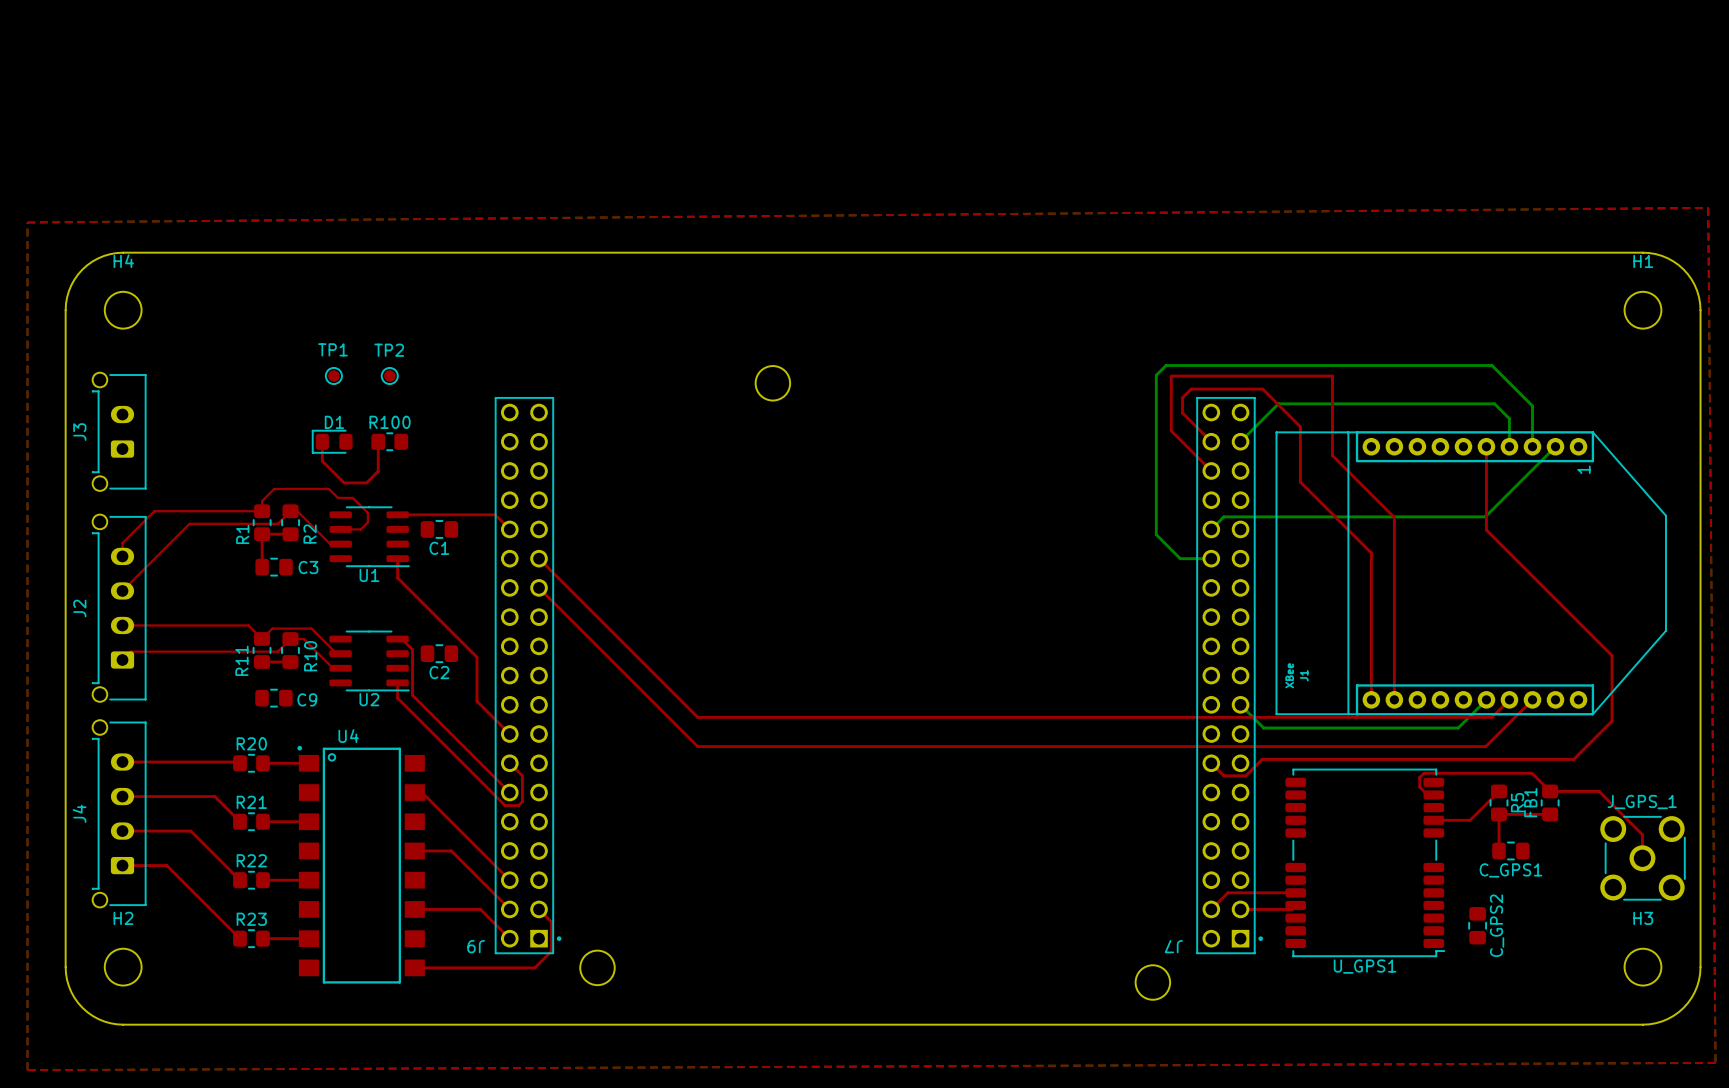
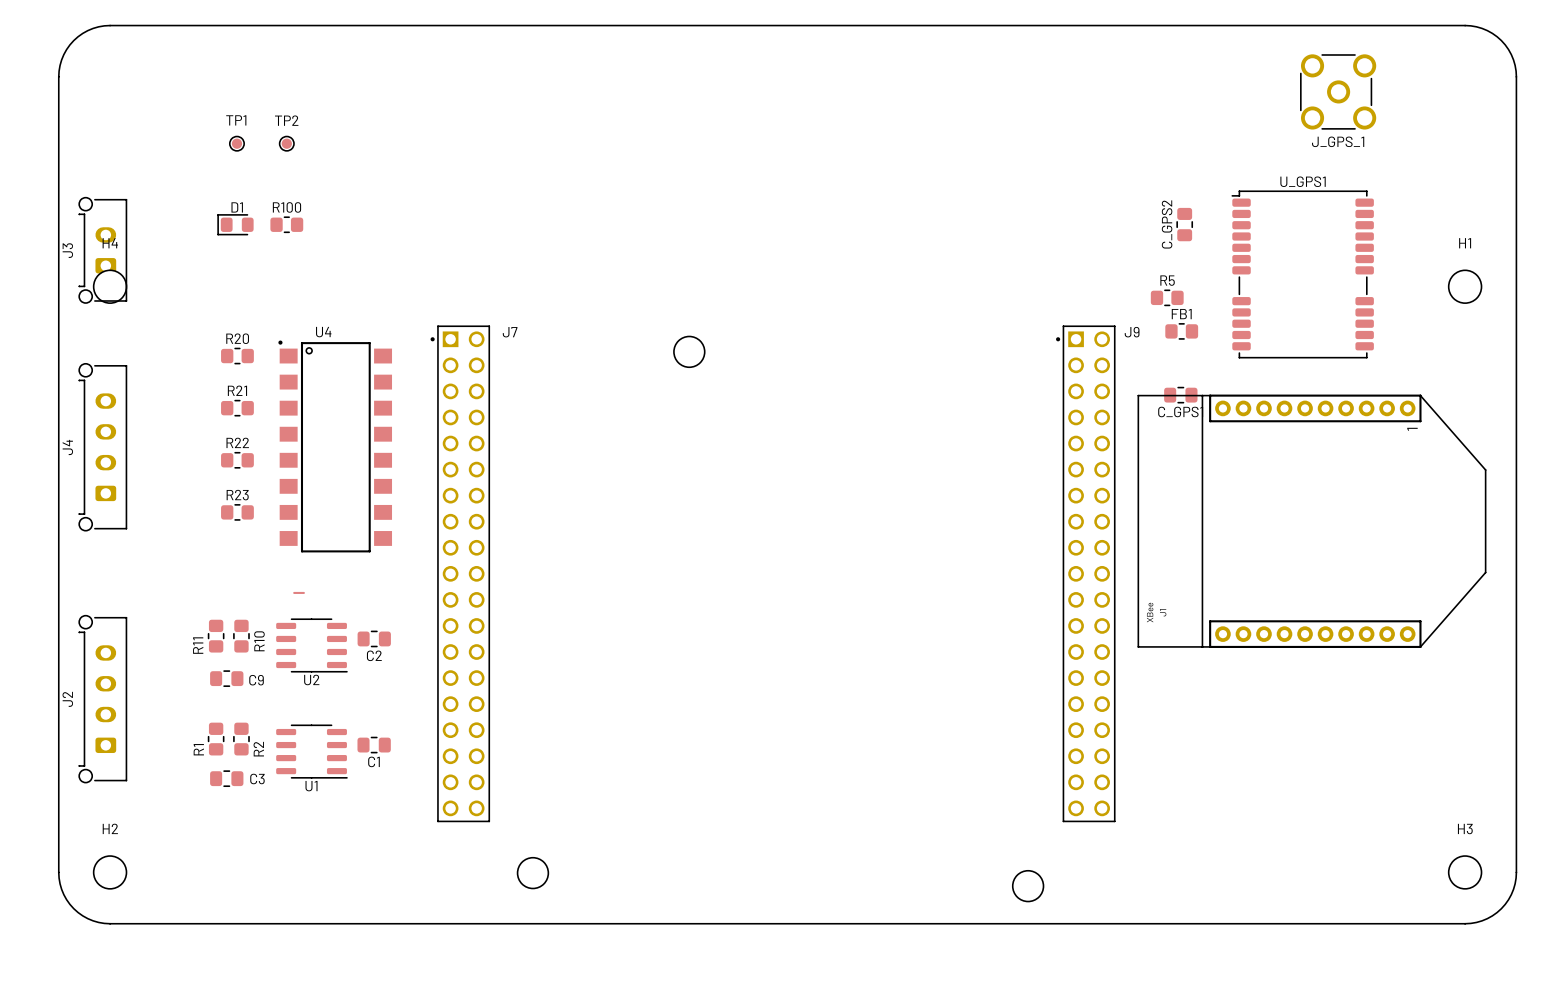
top zone outline: (1708, 207) (27, 222) (27, 1070) (1715, 1062) (1708, 207) -> none
board edge: (65, 310) (68, 291) (82, 269) (104, 255) (123, 252) (1642, 252) (1661, 255) (1683, 269) (1694, 285) (1700, 310) -> (58, 286) (60, 65) (66, 49) (78, 36) (93, 28) (110, 25) (1476, 26) (1487, 30) (1501, 40) (1511, 54) (1516, 71) (1516, 286)
TP1 position: (333, 375) -> (236, 143)
TP2 position: (389, 375) -> (286, 143)
J3 position: (119, 431) -> (102, 250)
top track: (322, 441) (322, 461) (344, 482) (366, 482) (378, 471) (378, 441) -> none
D1 position: (332, 441) -> (235, 224)
R100 position: (389, 441) -> (286, 224)
top track: (1211, 441) (1182, 412) (1182, 397) (1191, 389) (1262, 389) (1300, 426) (1300, 482) (1371, 553) (1371, 699) -> none
bottom track: (1240, 441) (1278, 403) (1494, 403) (1509, 418) (1509, 446) -> none
top track: (1486, 446) (1486, 530) (1612, 655) (1612, 721) (1573, 759) (1262, 759) (1245, 775) (1223, 775) (1211, 763) -> none
bottom track: (1532, 446) (1532, 406) (1491, 365) (1166, 365) (1156, 375) (1156, 534) (1180, 558) (1211, 558) -> none
bottom track: (1555, 446) (1485, 516) (1223, 516) (1211, 529) -> none
top track: (1211, 470) (1171, 430) (1171, 376) (1332, 376) (1332, 455) (1394, 517) (1394, 699) -> none
top track: (397, 514) (495, 514) (509, 529) -> none
R2 position: (262, 522) -> (216, 739)
R1 position: (290, 522) -> (241, 739)
top track: (340, 529) (360, 529) (367, 522) (367, 512) (352, 497) (337, 497) (329, 488) (274, 488) (262, 501) (262, 511) (154, 511) (122, 543) (122, 556) (124, 556) -> none
C1 position: (439, 529) -> (374, 745)
top track: (290, 534) (262, 534) (262, 567) -> none
U1 position: (369, 536) -> (311, 751)
top track: (340, 544) (330, 544) (297, 511) (290, 511) (277, 523) (189, 523) (122, 590) -> none
top track: (397, 558) (397, 577) (477, 657) (477, 701) (509, 734) -> none
top track: (539, 558) (697, 717) (1491, 717) (1509, 699) -> none
C3 position: (274, 567) -> (226, 778)
top track: (539, 587) (697, 746) (1485, 746) (1532, 699) -> none
J2 position: (119, 608) -> (102, 699)
top track: (122, 625) (248, 625) (262, 638) (272, 628) (311, 628) (336, 653) -> none
top track: (397, 639) (401, 639) (412, 649) (412, 695) (509, 792) -> none
R11 position: (262, 650) -> (216, 636)
R10 position: (290, 650) -> (241, 636)
C2 position: (439, 653) -> (374, 638)
top track: (122, 659) (130, 651) (277, 651) (290, 638) (303, 638) (329, 665) -> none
U2 position: (369, 660) -> (311, 645)
top track: (262, 662) (290, 662) -> none
J9 rotation: 0° (528, 675) -> 180° (1085, 573)
J9 position: (528, 675) -> (1085, 573)
J7 rotation: 0° (1229, 675) -> 180° (460, 573)
J7 position: (1229, 675) -> (460, 573)
top track: (397, 682) (397, 698) (505, 805) (518, 805) (522, 801) (522, 775) (509, 763) -> none
C9 position: (273, 698) -> (226, 678)
bottom track: (1486, 699) (1458, 728) (1263, 728) (1240, 704) -> none
top track: (122, 762) (239, 763) -> none
R20 position: (251, 763) -> (237, 356)
top track: (263, 763) (308, 763) -> none
top track: (1498, 791) (1470, 820) (1433, 820) -> none
top track: (414, 792) (422, 792) (509, 880) -> none
top track: (1433, 794) (1427, 794) (1419, 787) (1419, 777) (1424, 773) (1531, 773) (1550, 791) (1599, 791) (1642, 834) (1642, 858) -> none
top track: (122, 796) (214, 796) (239, 821) -> none
R5 rotation: 0° (1498, 802) -> 90° clockwise (1167, 297)
R5 position: (1498, 802) -> (1167, 297)
R5 name position: R5 (1517, 802) -> R5 (1167, 280)
FB1 rotation: 0° (1550, 802) -> 90° clockwise (1181, 331)
FB1 position: (1550, 802) -> (1181, 331)
J4 position: (119, 813) -> (102, 447)
top track: (1550, 814) (1498, 814) (1498, 850) -> none
R21 position: (251, 821) -> (237, 408)
top track: (263, 821) (308, 821) -> none
top track: (122, 831) (190, 831) (239, 880) -> none
top track: (414, 850) (451, 850) (509, 909) -> none
C_GPS1 position: (1510, 850) -> (1180, 395)
J_GPS_1 rotation: 0° (1642, 858) -> 180° (1338, 91)
J_GPS_1 position: (1642, 858) -> (1338, 91)
U_GPS1 rotation: 0° (1365, 862) -> 180° (1302, 274)
U_GPS1 position: (1365, 862) -> (1302, 274)
U4 position: (361, 864) -> (335, 446)
top track: (122, 865) (166, 865) (239, 938) -> none
R22 position: (251, 880) -> (237, 460)
top track: (263, 880) (308, 880) -> none
top track: (1295, 892) (1227, 892) (1211, 909) -> none
top track: (1295, 905) (1291, 909) (1240, 909) -> none
top track: (414, 909) (480, 909) (509, 938) -> none
top track: (539, 909) (551, 921) (551, 951) (534, 967) (414, 967) -> none
C_GPS2 position: (1477, 925) -> (1184, 224)
C_GPS2 name position: C_GPS2 (1497, 925) -> C_GPS2 (1167, 224)
R23 position: (251, 938) -> (237, 512)
top track: (263, 938) (308, 938) -> none

